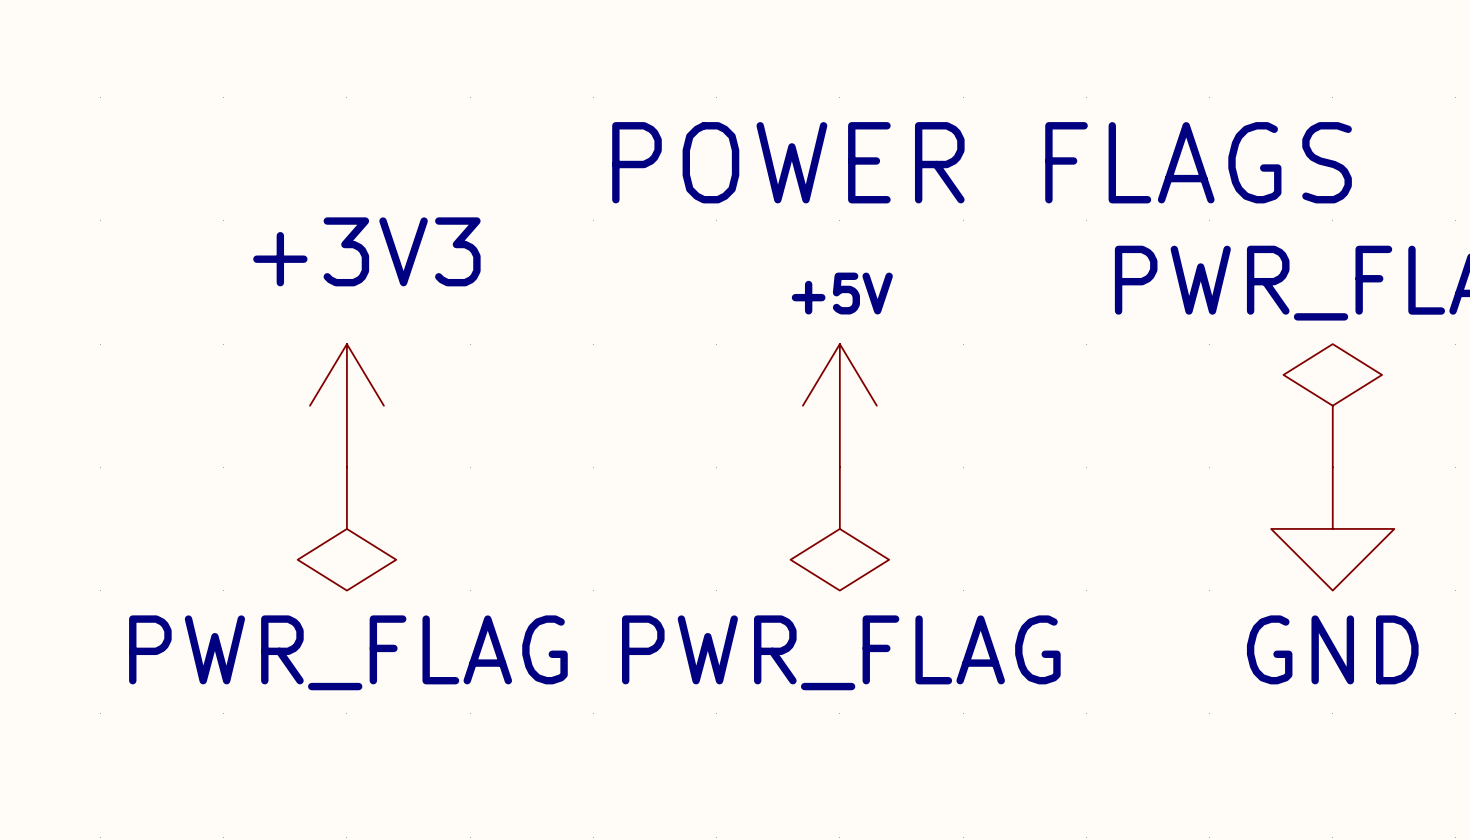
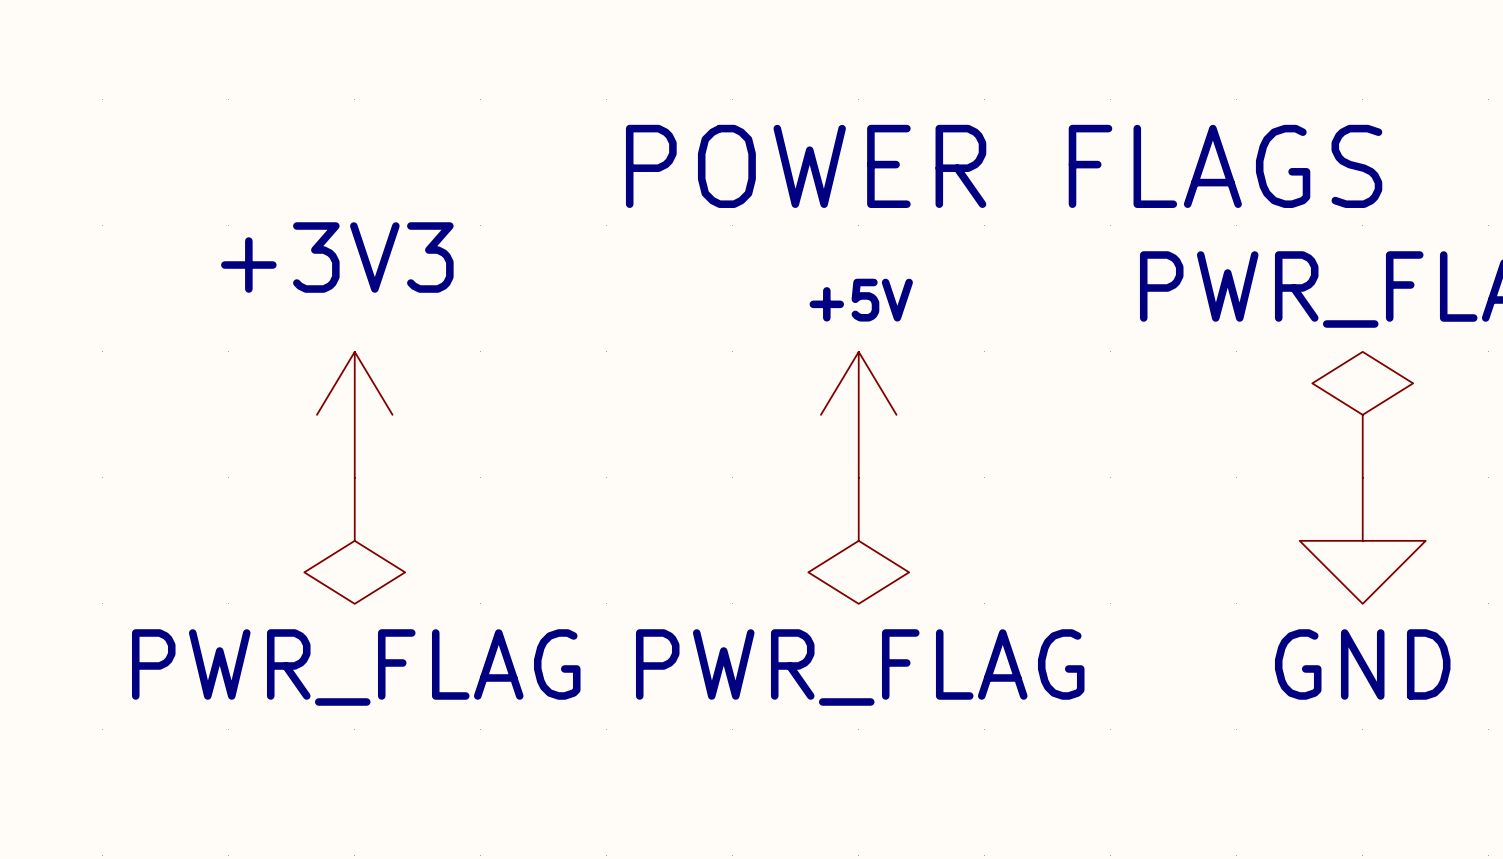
power symbol text position: +3V3 (366, 251) -> +3V3 (337, 257)

